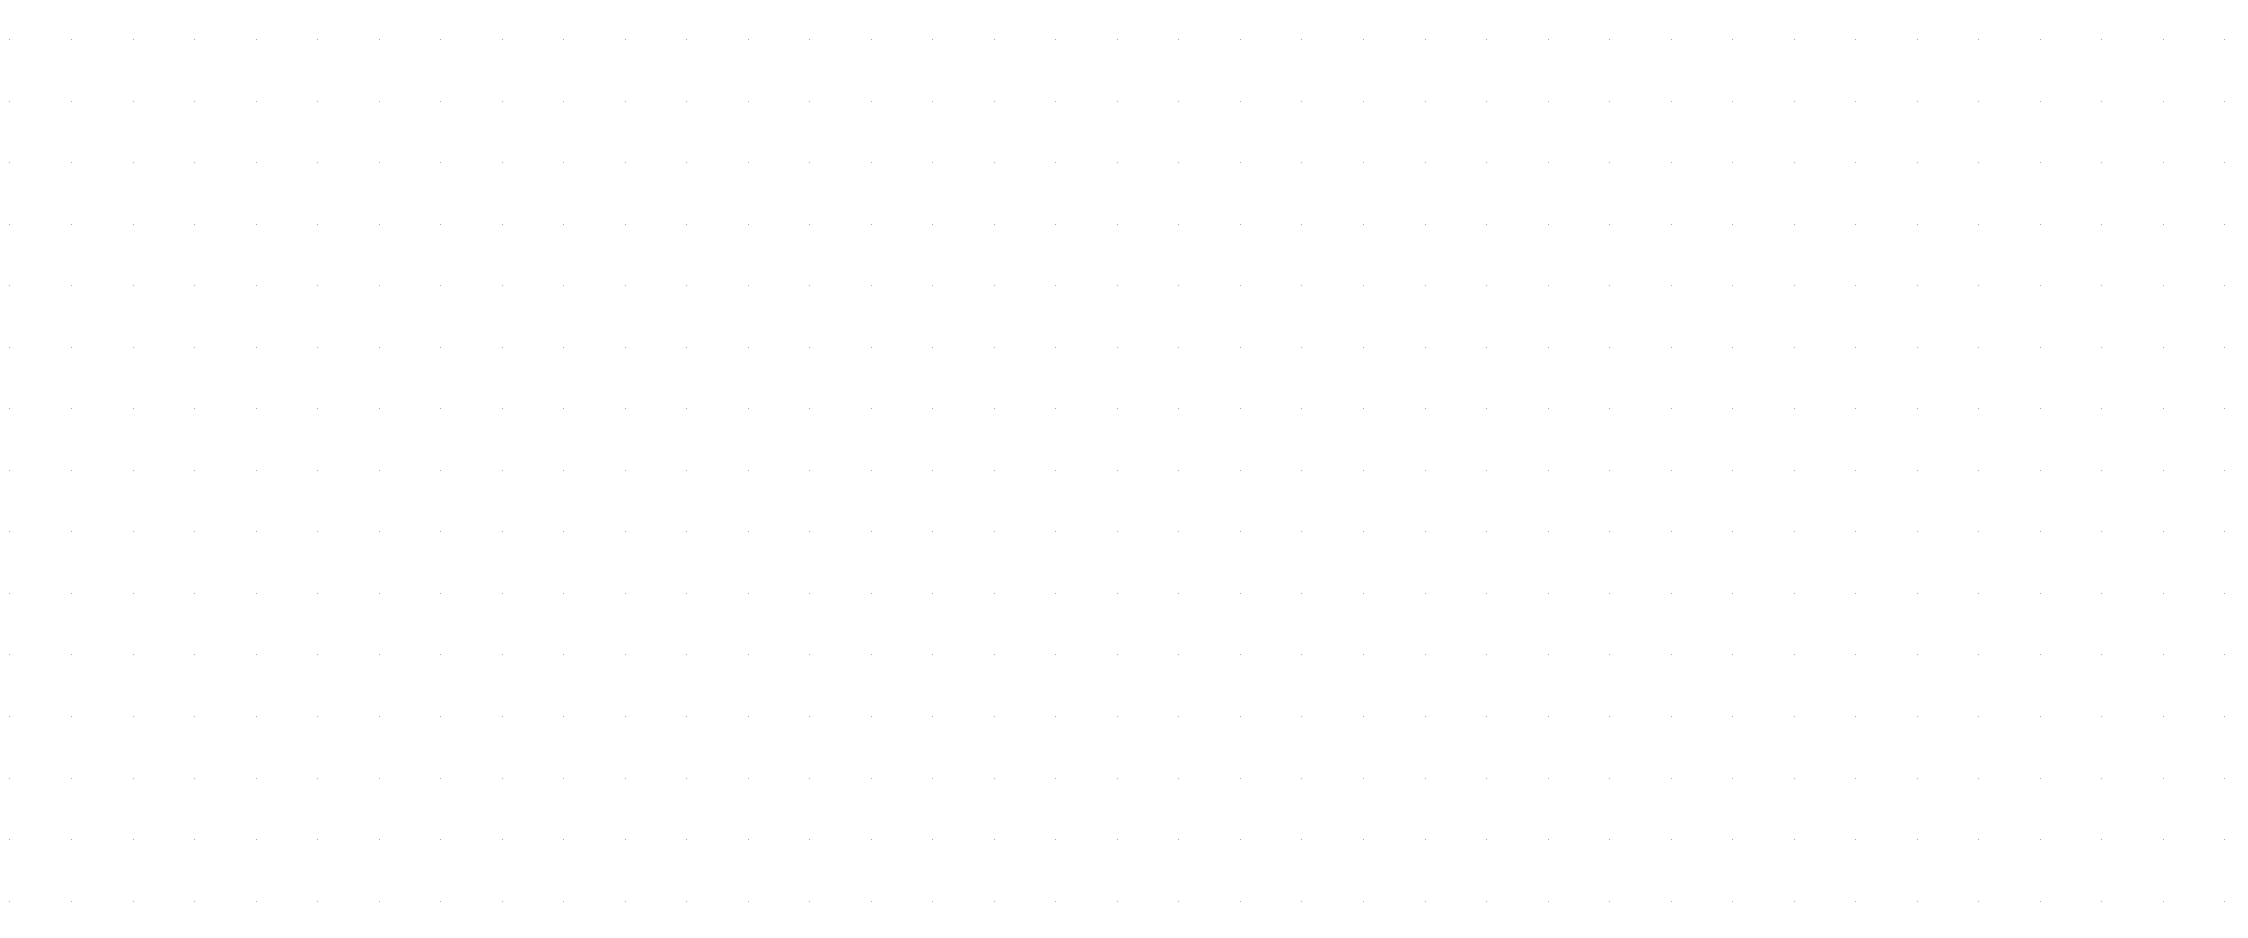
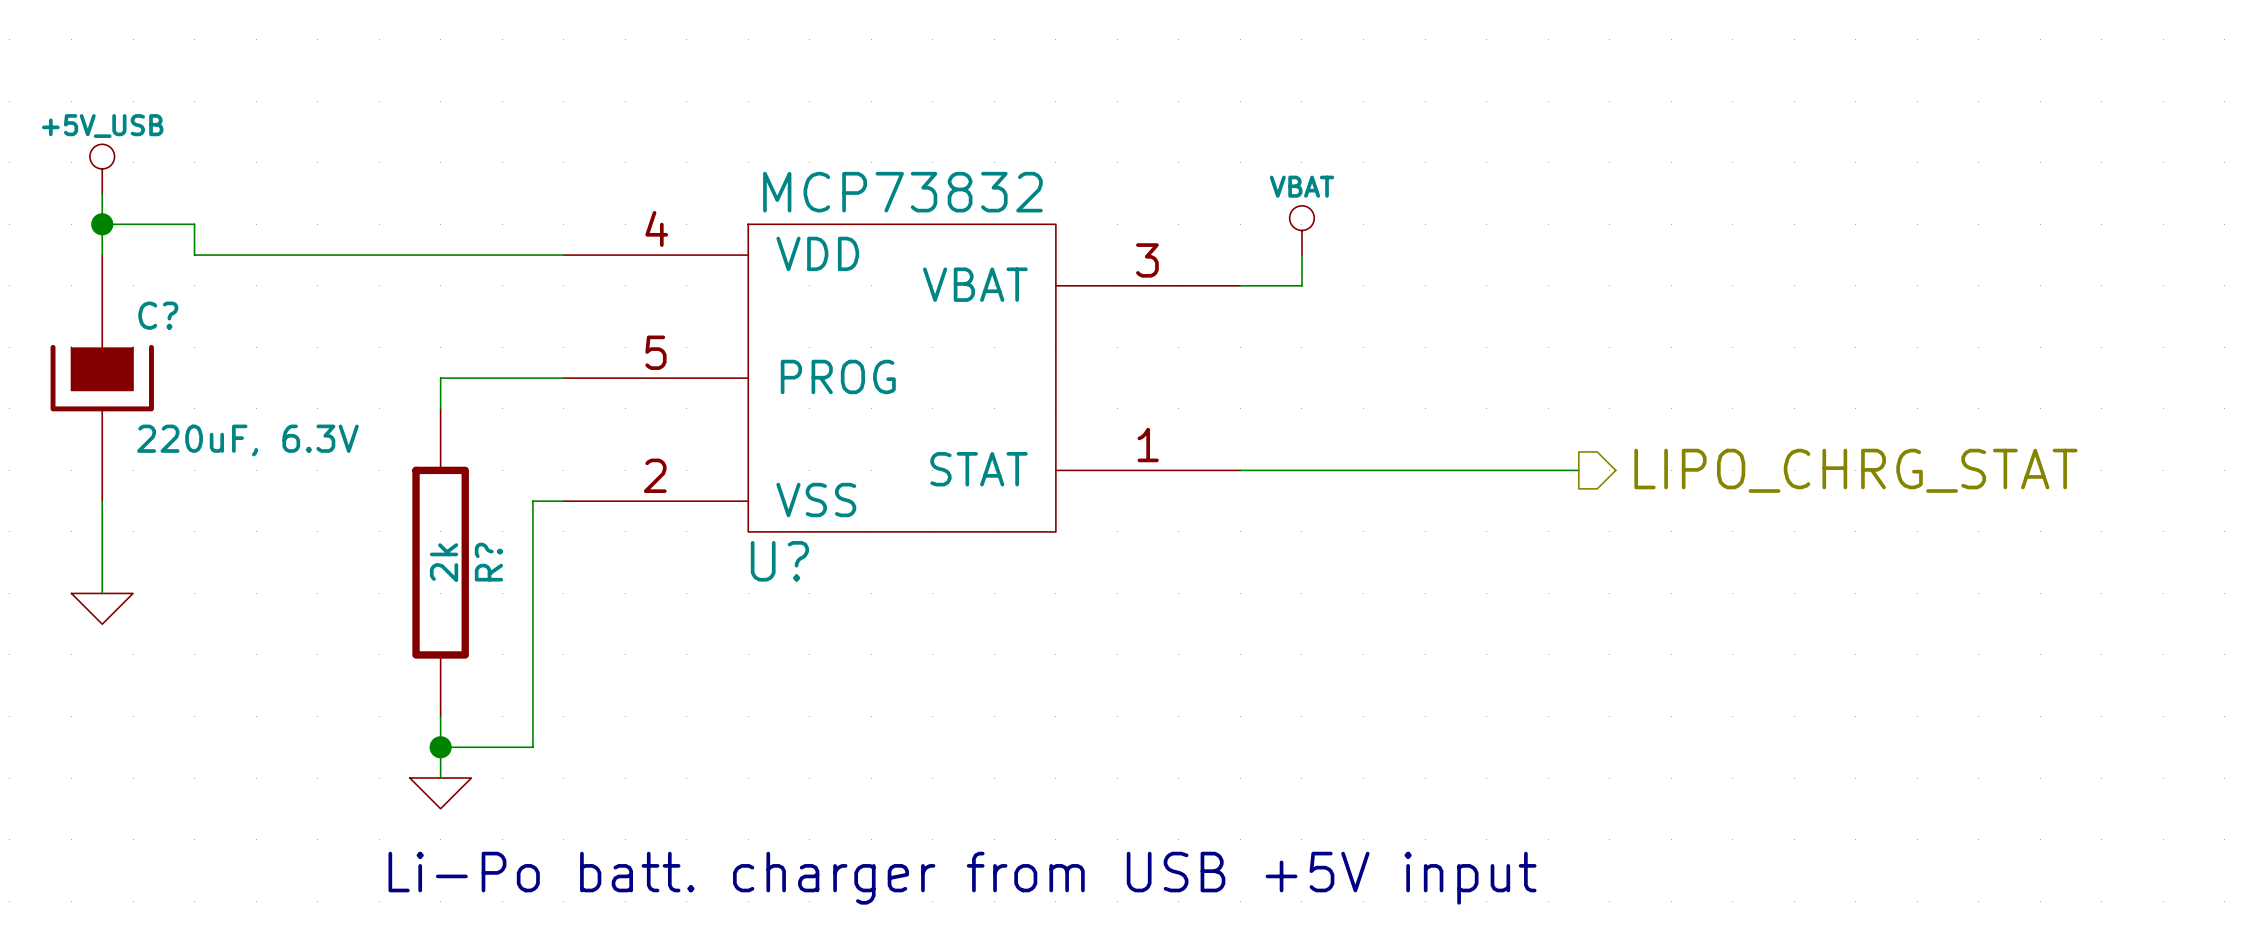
power symbol: none -> +5V_USB (102, 168)
wire: none -> (102, 193) (102, 255)
wire: none -> (102, 224) (194, 224) (194, 255) (563, 255)
junction: none -> (102, 224)
power symbol: none -> VBAT (1301, 230)
wire: none -> (1301, 255) (1301, 285) (1240, 285)
C?: none -> 220uF, 6.3V (102, 378)
wire: none -> (563, 378) (440, 378) (440, 408)
U?: none -> MCP73832 (902, 378)
wire: none -> (1240, 470) (1578, 470)
hierarchical label: none -> LIPO_CHRG_STAT (1855, 470)
wire: none -> (102, 501) (102, 593)
wire: none -> (563, 501) (532, 501) (532, 747) (440, 747)
R?: none -> 2k (440, 562)
power symbol: none -> (102, 608)
wire: none -> (440, 716) (440, 778)
junction: none -> (440, 747)
power symbol: none -> (440, 793)
text: none -> Li-Po batt. charger from USB +5V input (962, 878)

